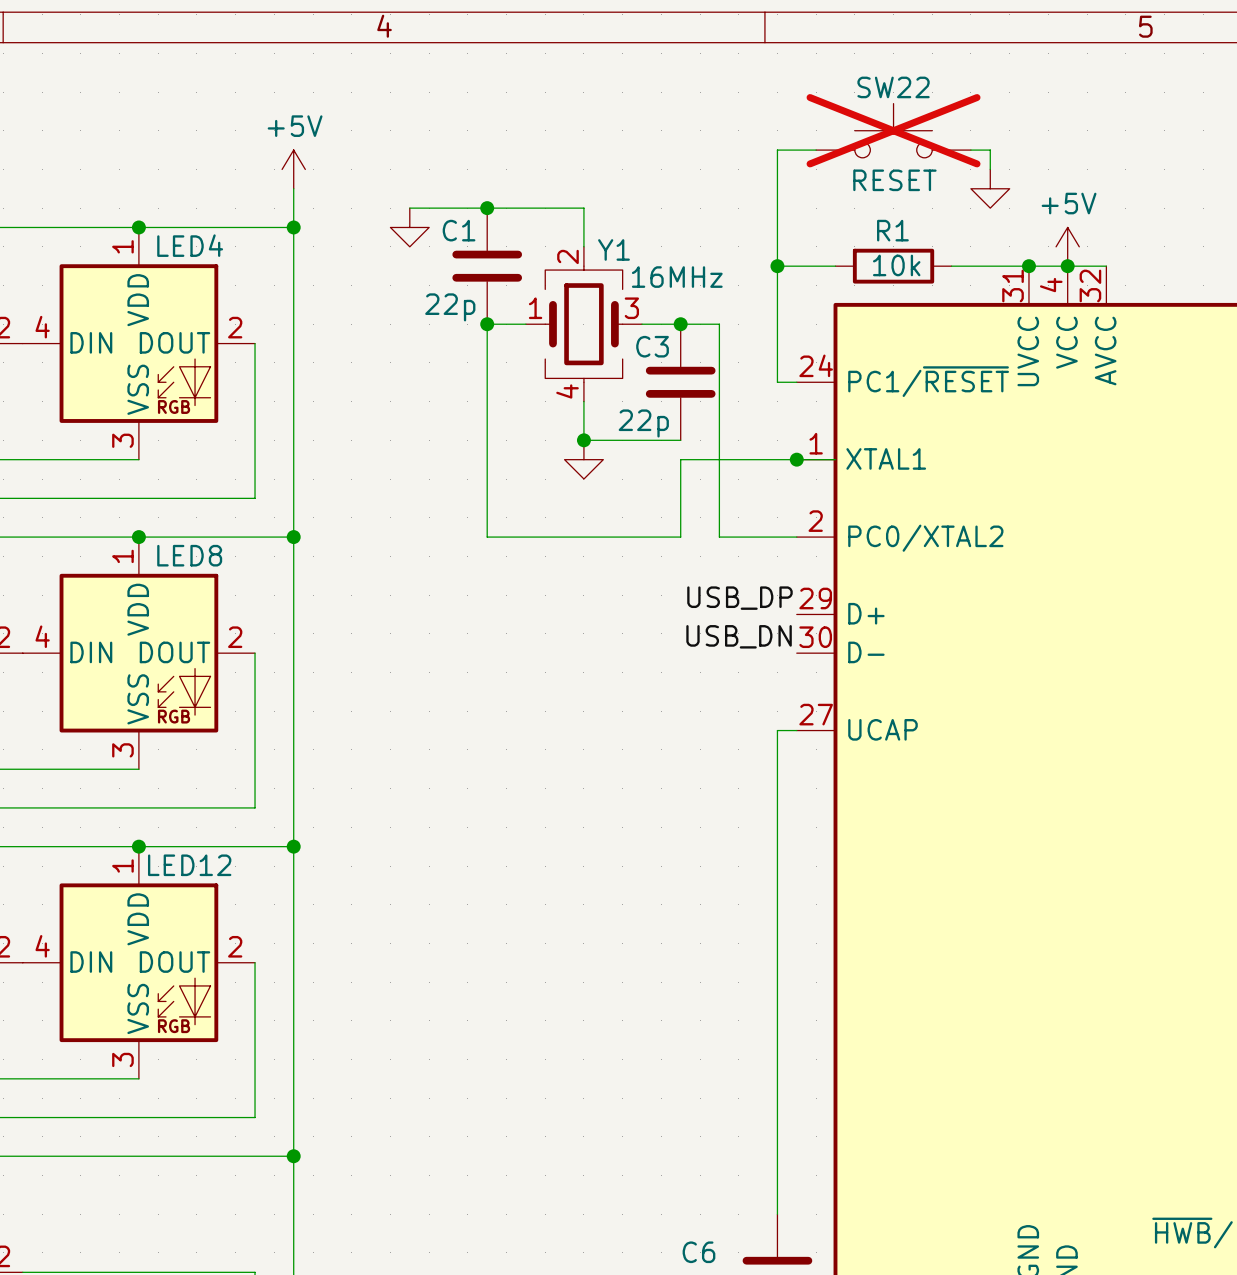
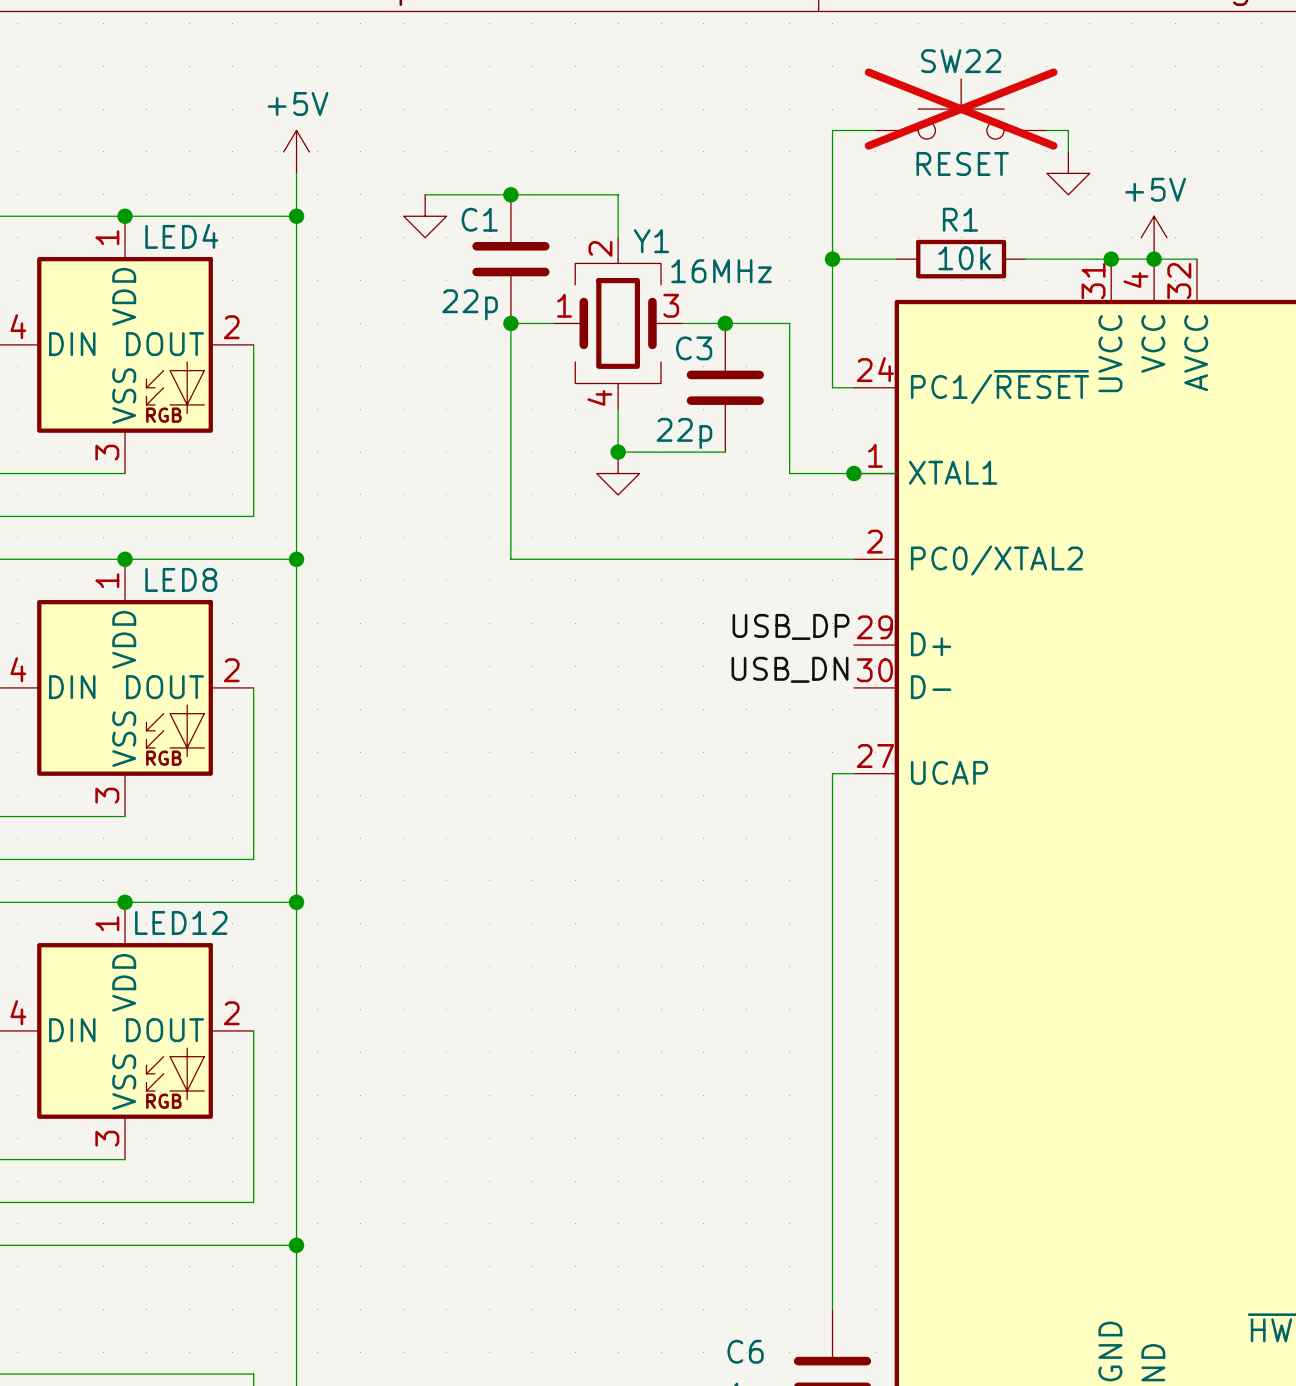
wire: (719, 324) (719, 537) -> (768, 323) (789, 323) (789, 473)
wire: (738, 459) (680, 459) (680, 537) -> (768, 559) (725, 559)

